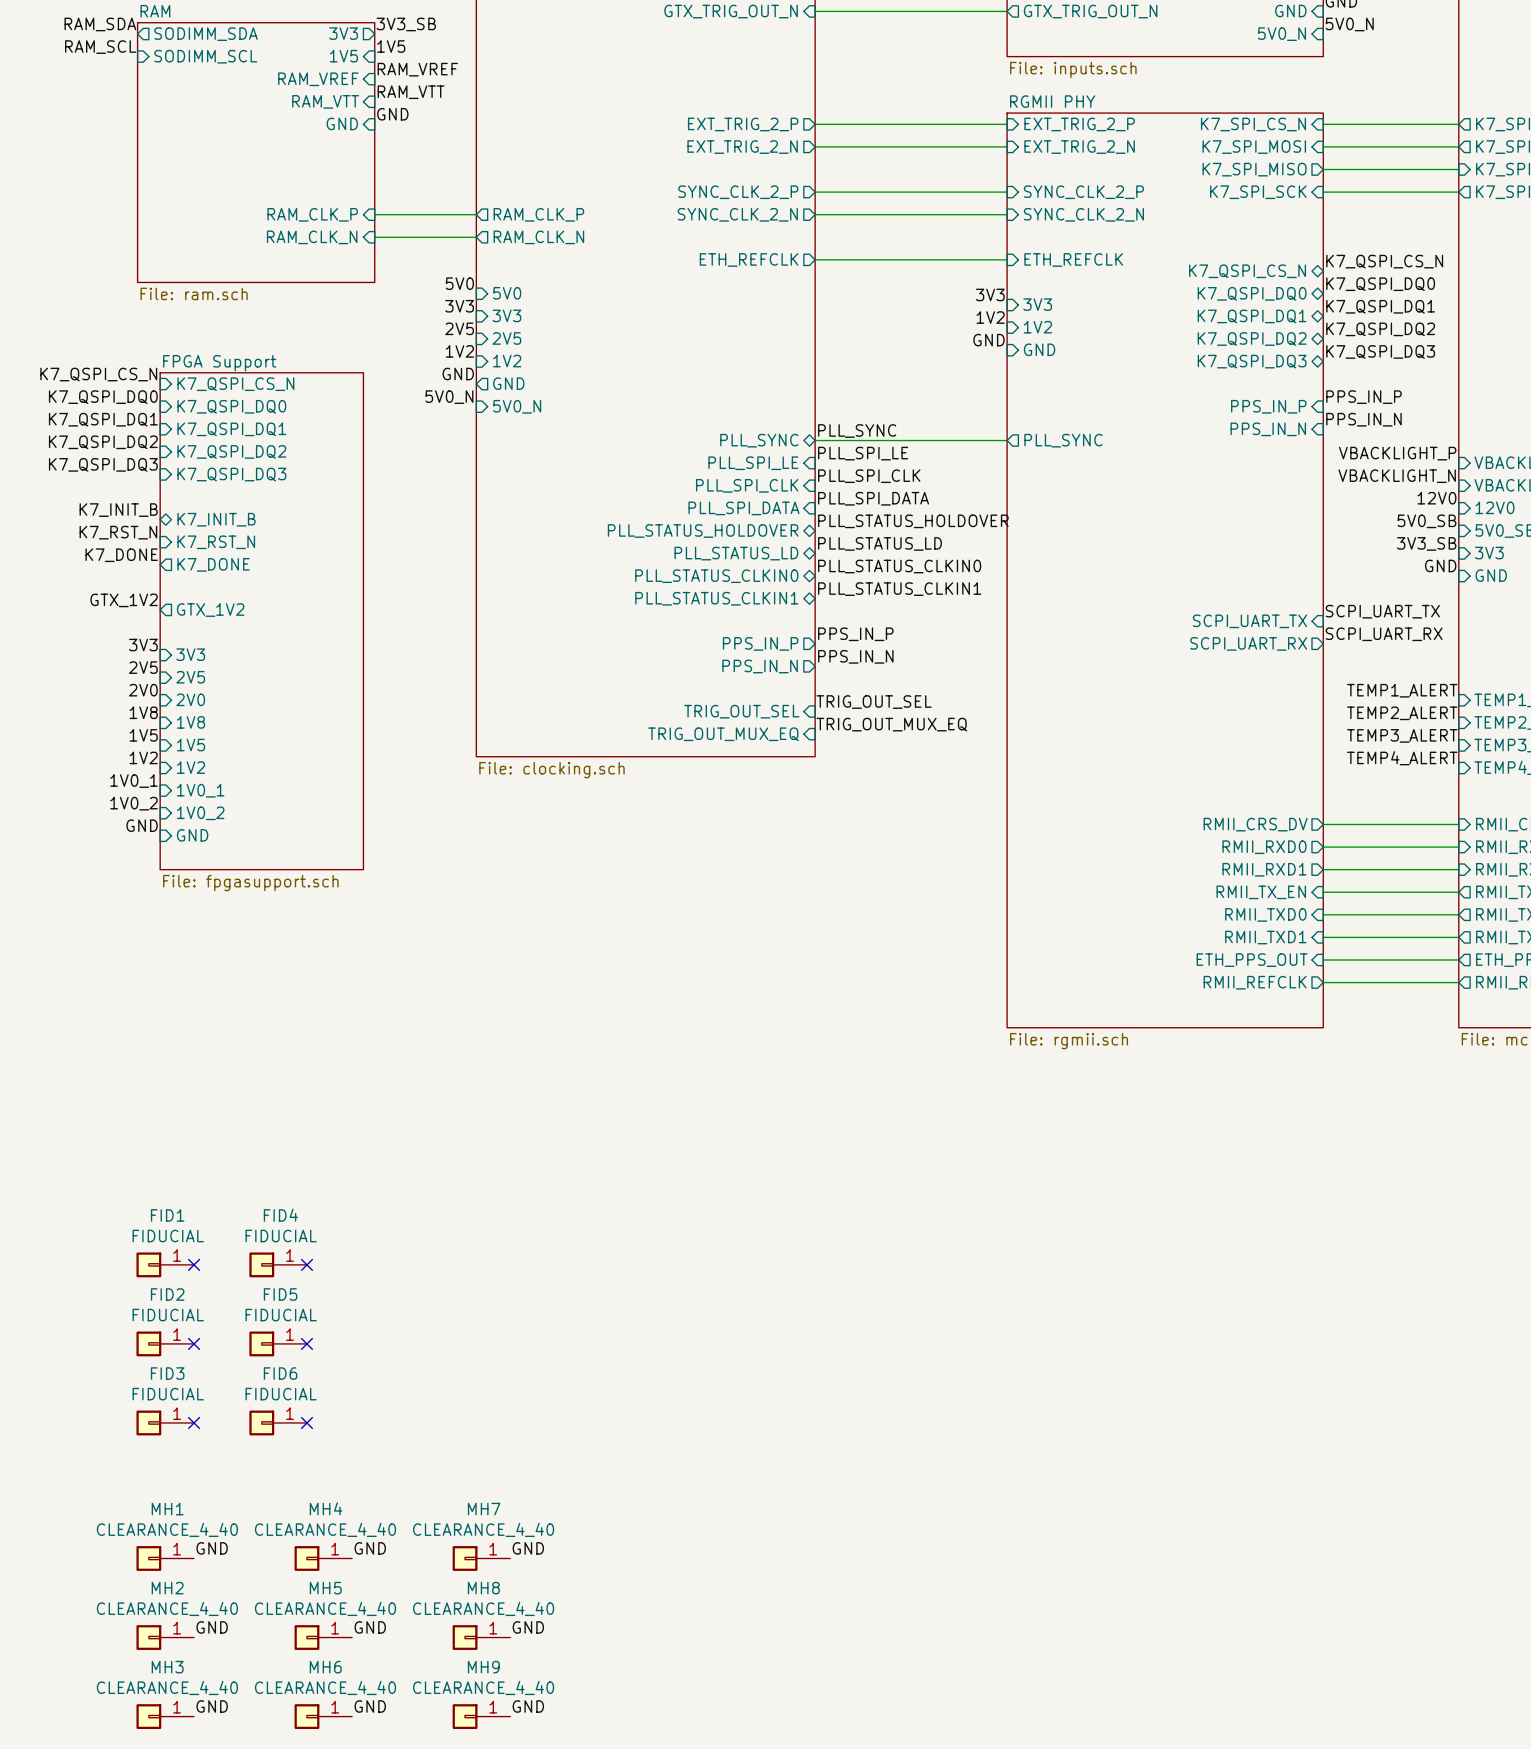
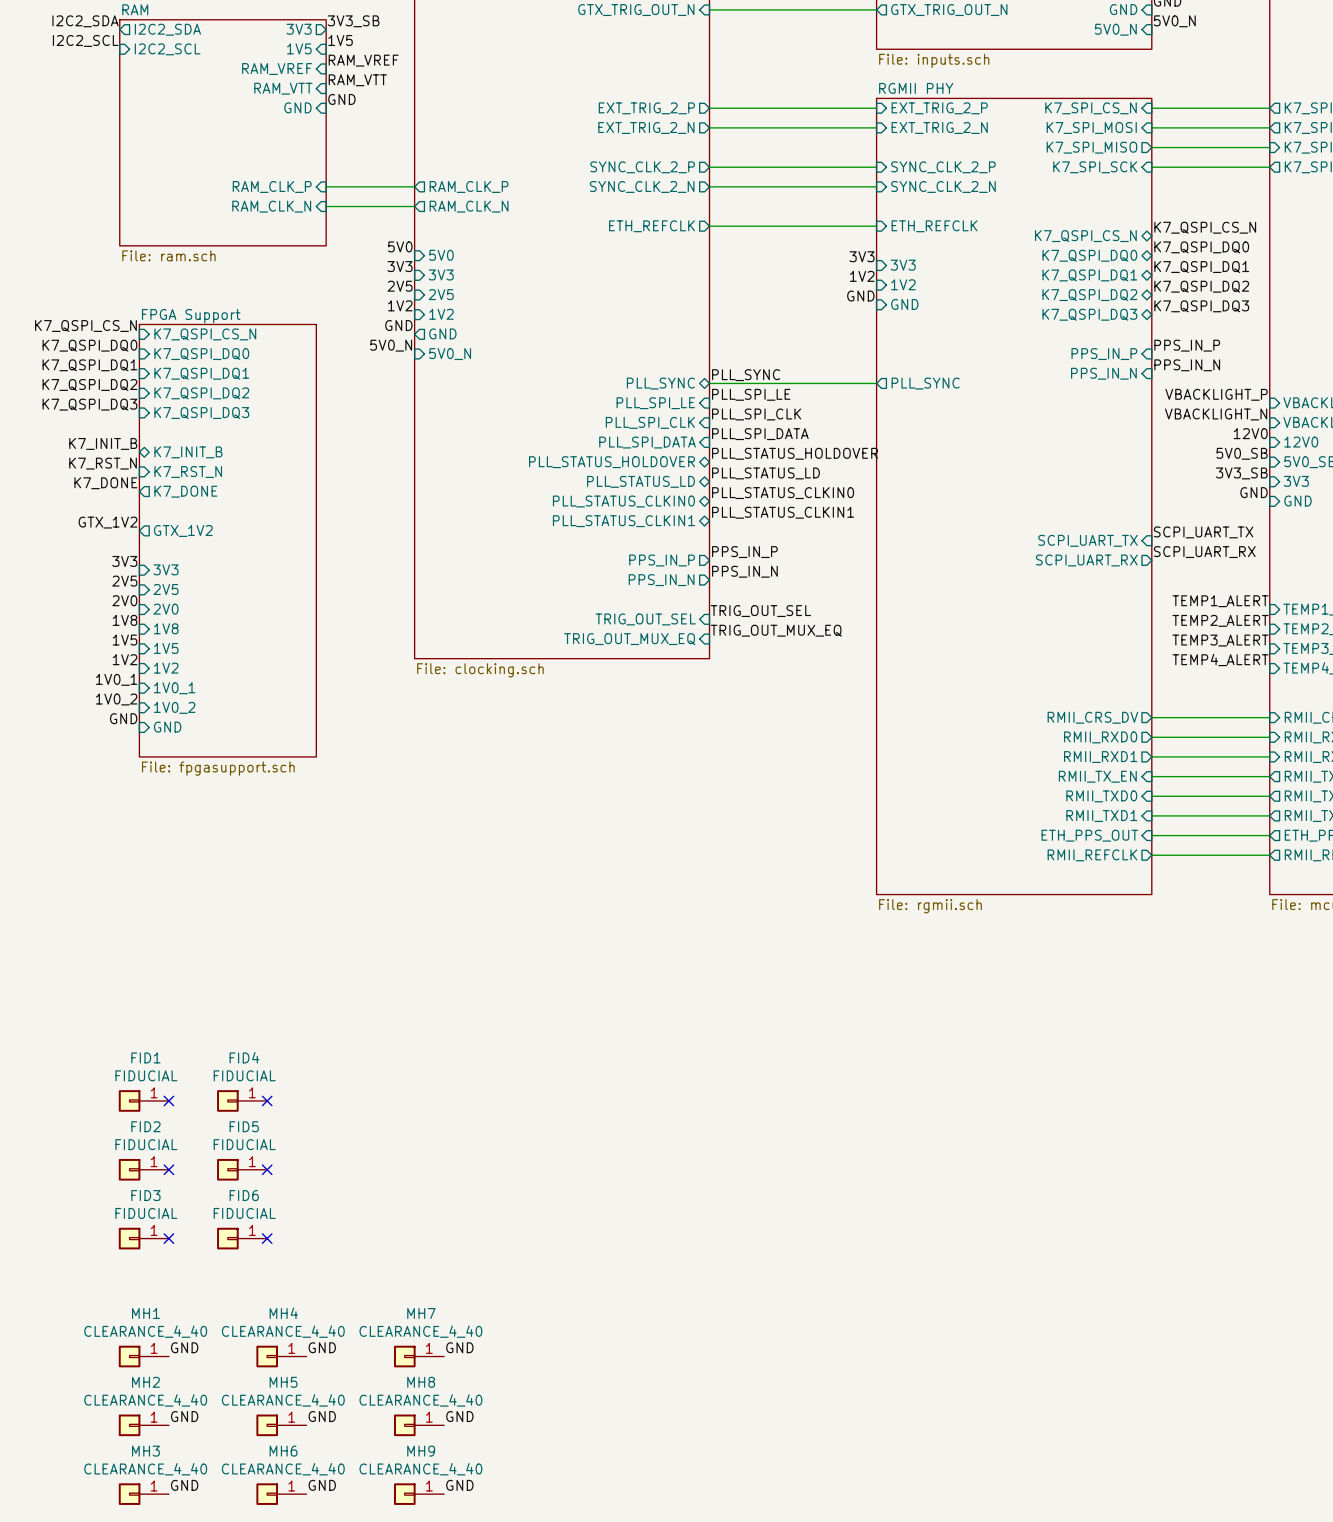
label: RAM_SDA (100, 24) -> I2C2_SDA (85, 21)
sheet pin: SODIMM_SDA (206, 34) -> I2C2_SDA (167, 29)
label: RAM_SCL (100, 47) -> I2C2_SCL (85, 40)
sheet pin: SODIMM_SCL (205, 56) -> I2C2_SCL (167, 49)

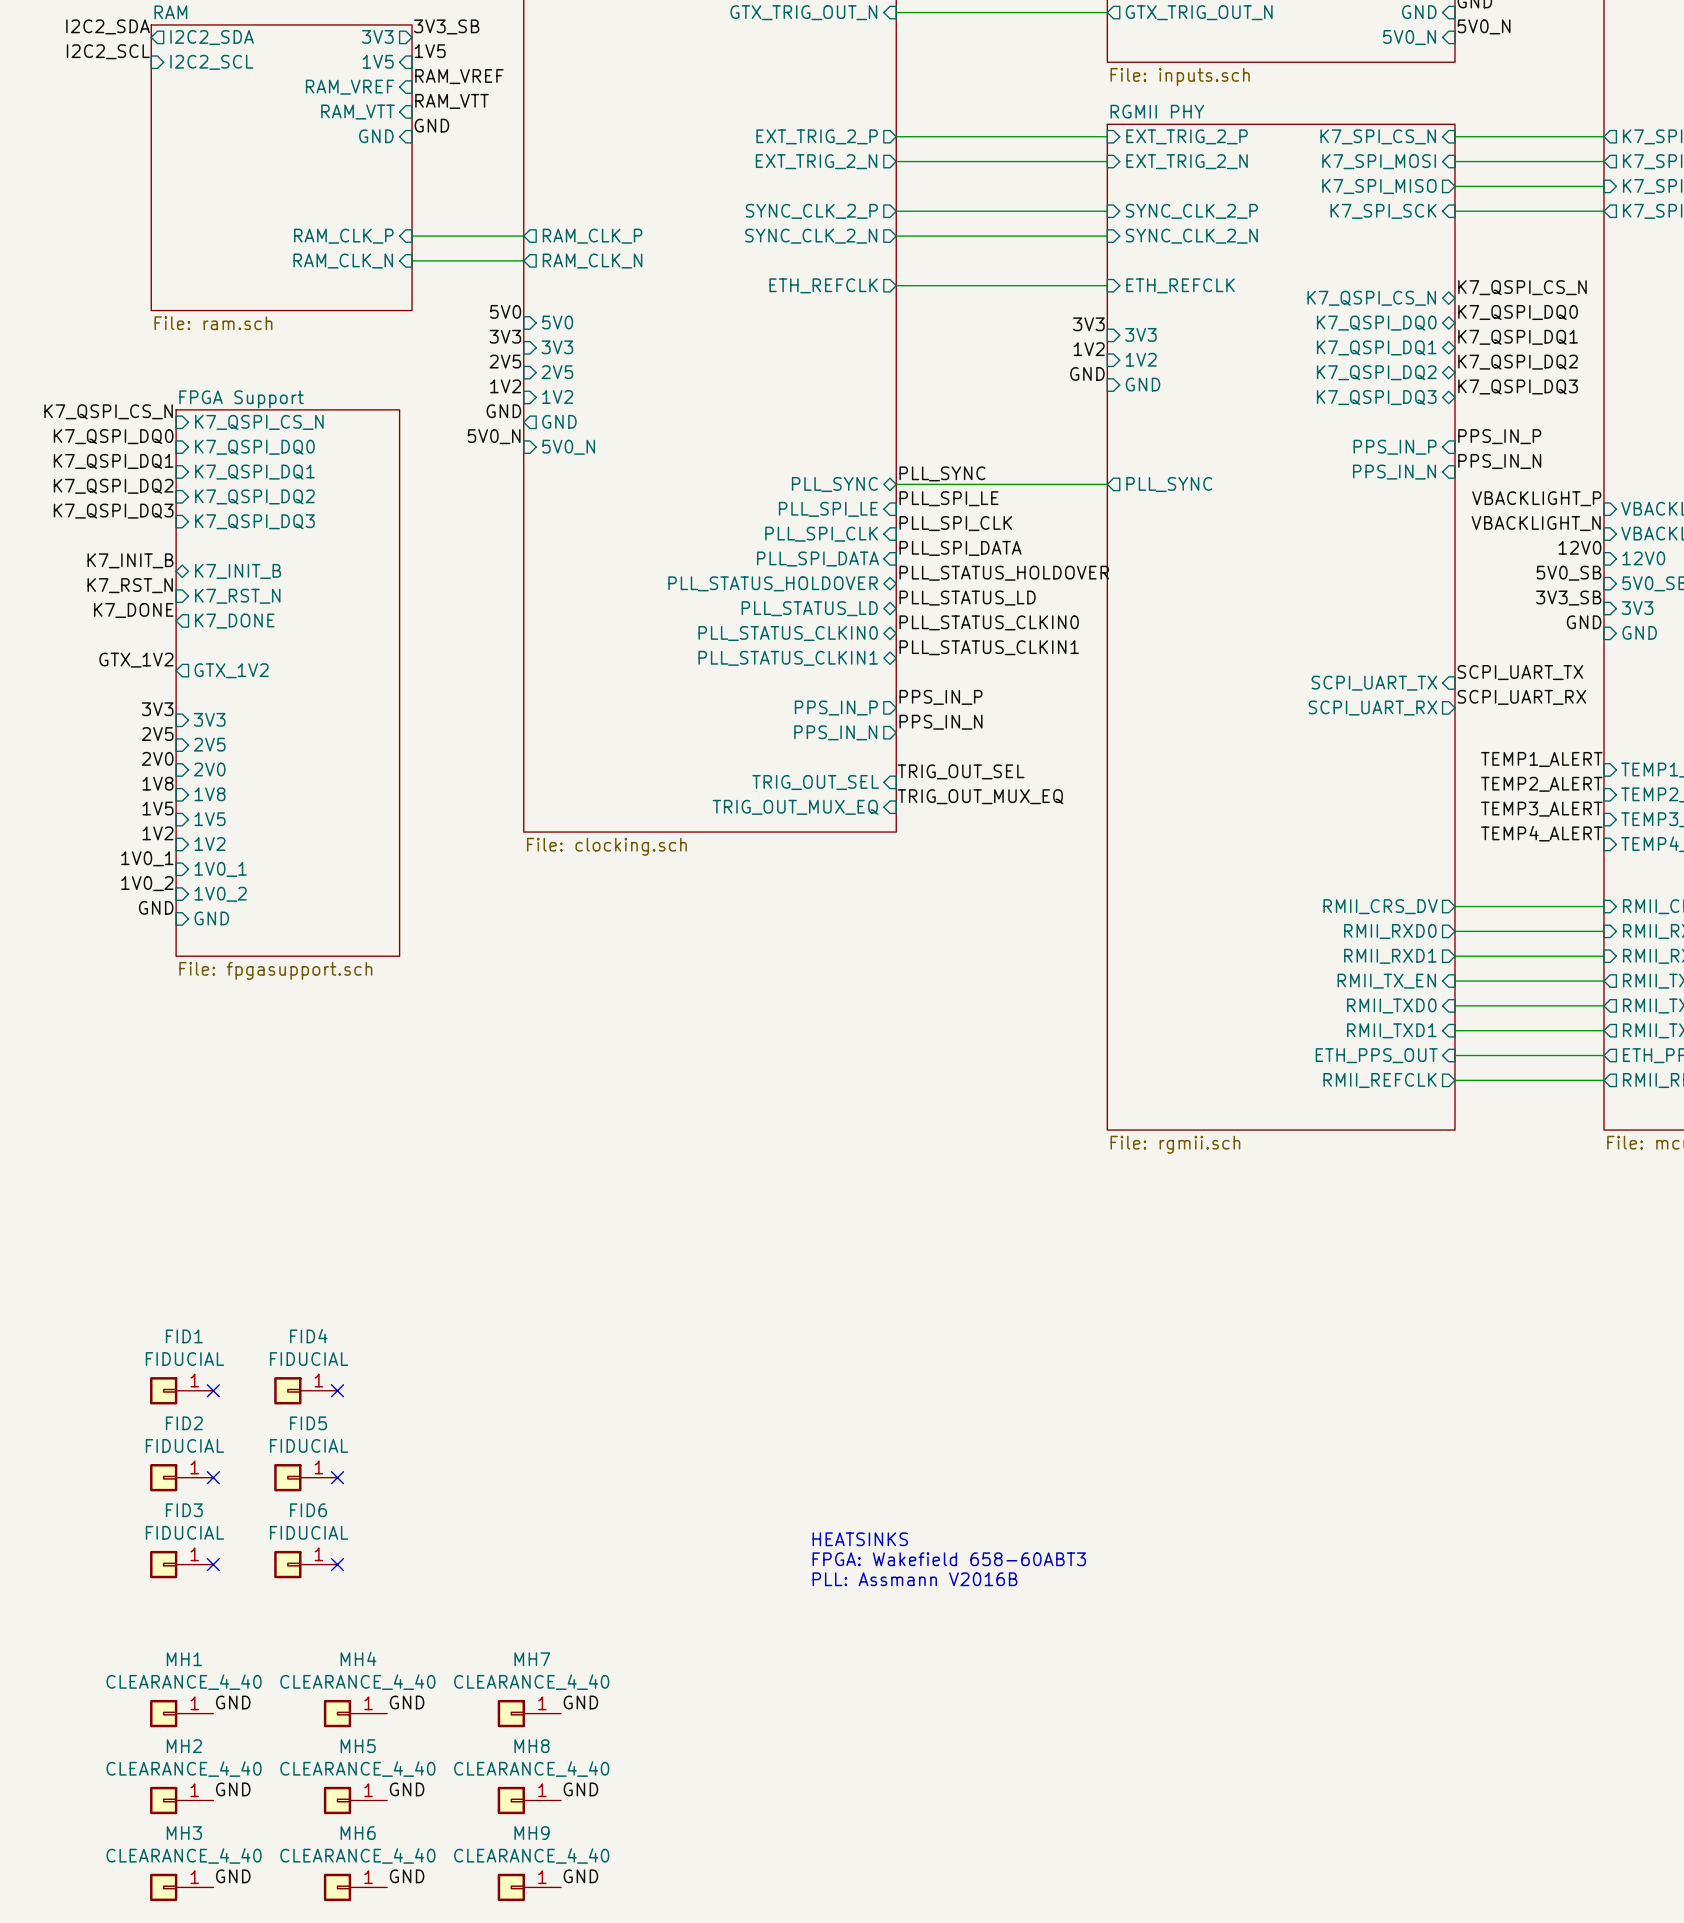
text: none -> HEATSINKS (860, 1539)
text: none -> FPGA: Wakefield 658-60ABT3 (949, 1559)
text: none -> PLL: Assmann V2016B (914, 1579)

